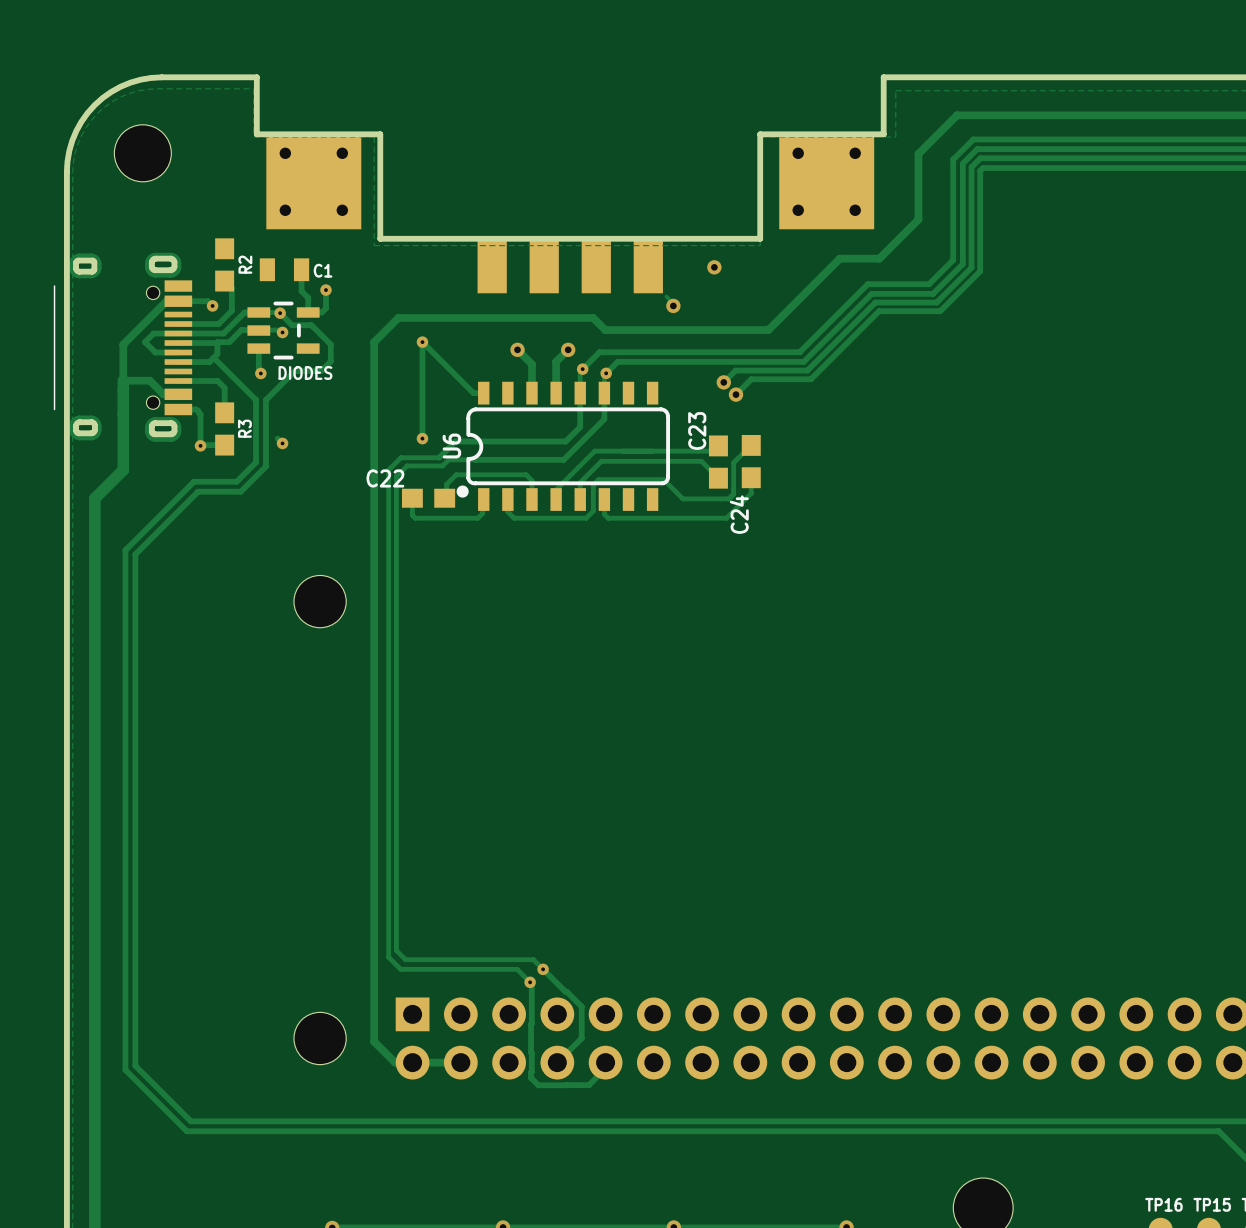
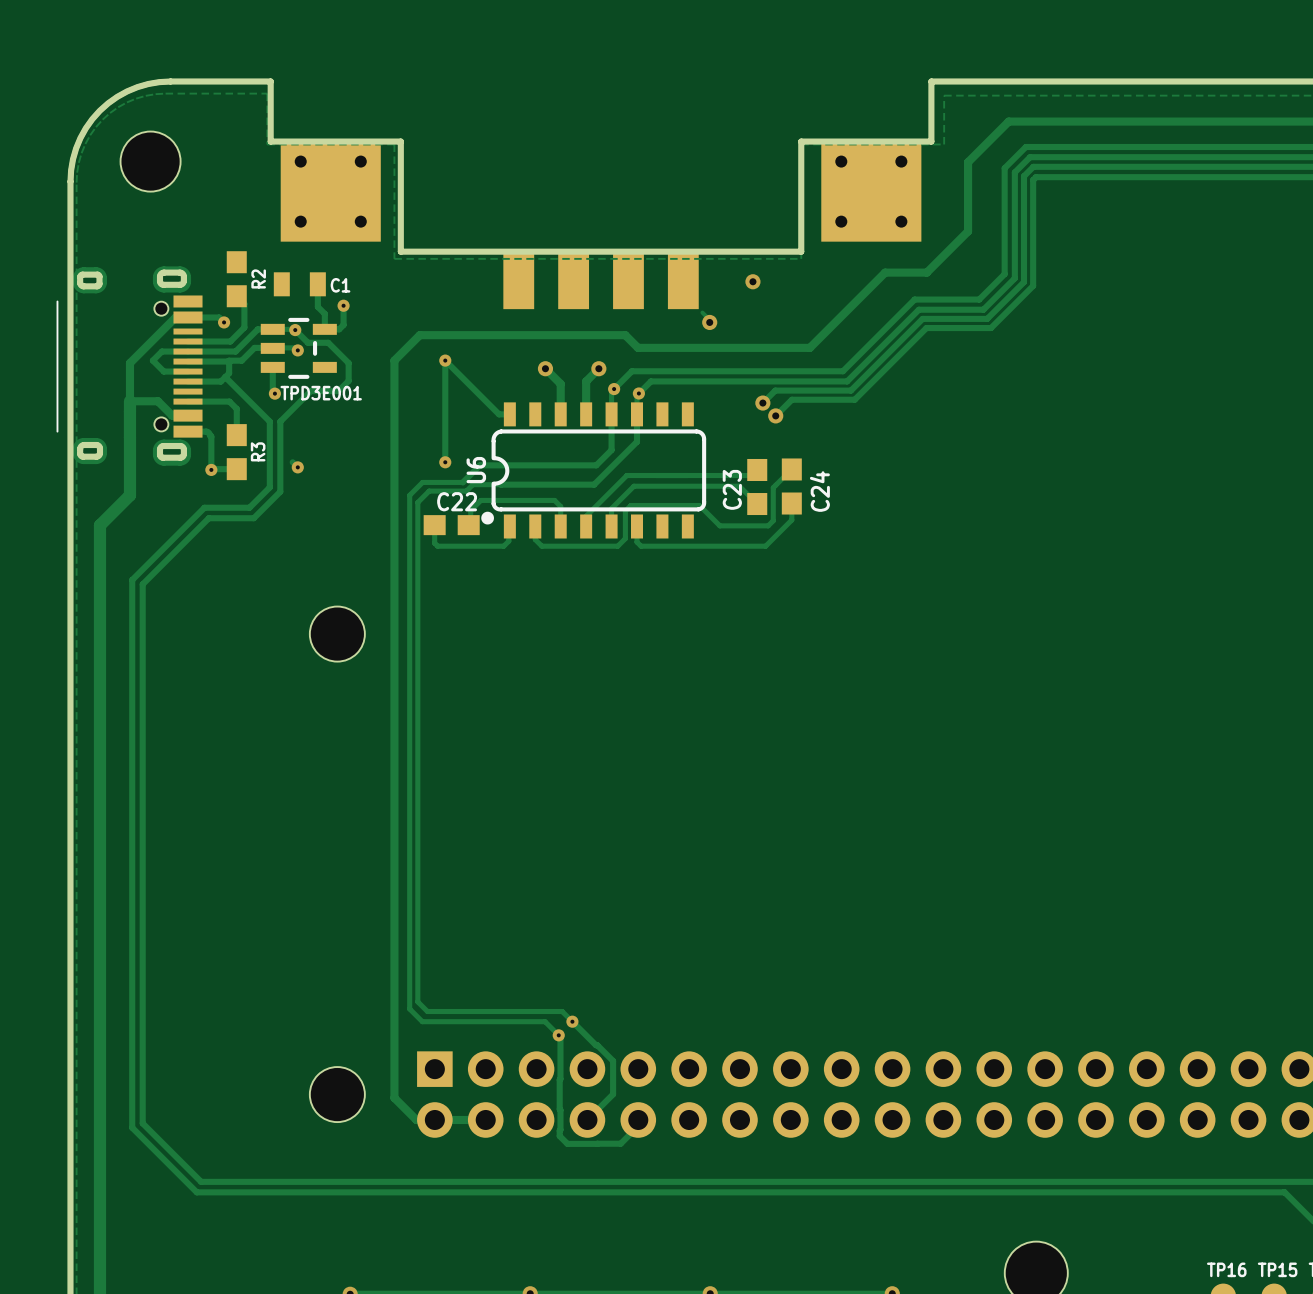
DIODES name: DIODES (305, 372) -> TPD3E001 (321, 393)
C23 name position: C23 (697, 430) -> C23 (732, 489)
C22 name position: C22 (385, 478) -> C22 (457, 501)
C24 name position: C24 (739, 514) -> C24 (819, 491)

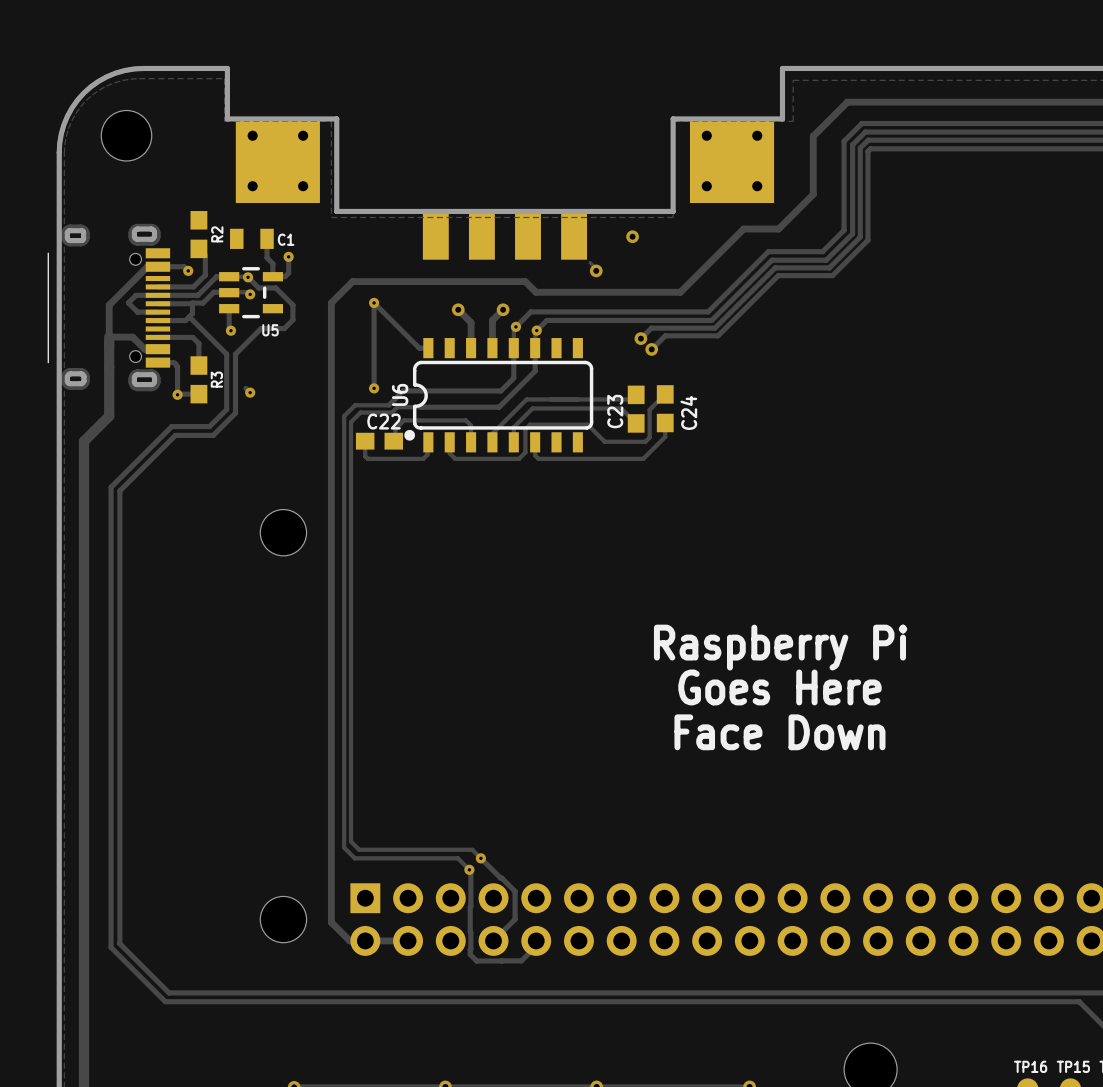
TPD3E001 name: TPD3E001 (321, 393) -> U5 (270, 330)
text: none -> Raspberry Pi (780, 647)
text: none -> Goes Here (779, 687)
text: none -> Face Down (779, 732)

